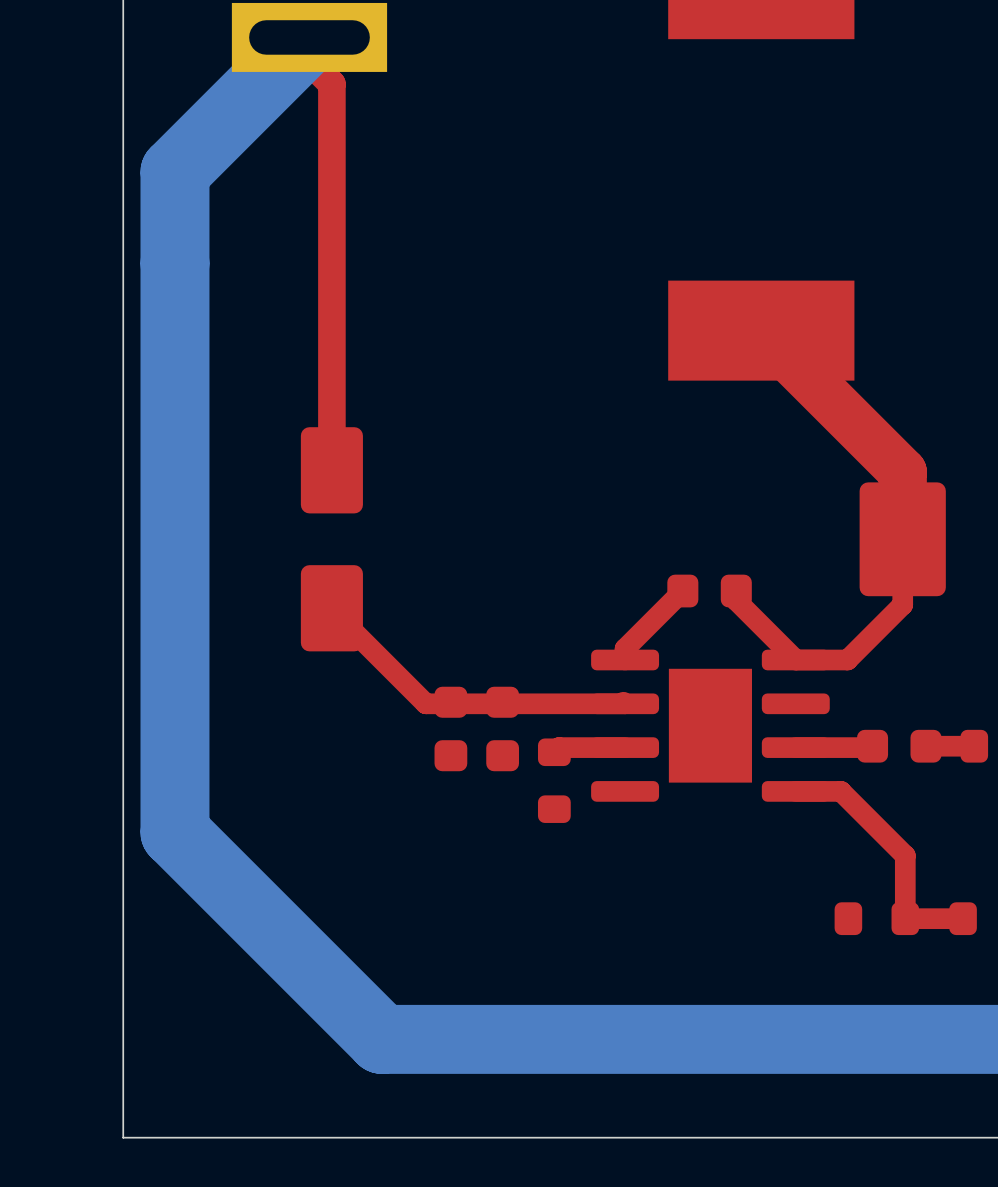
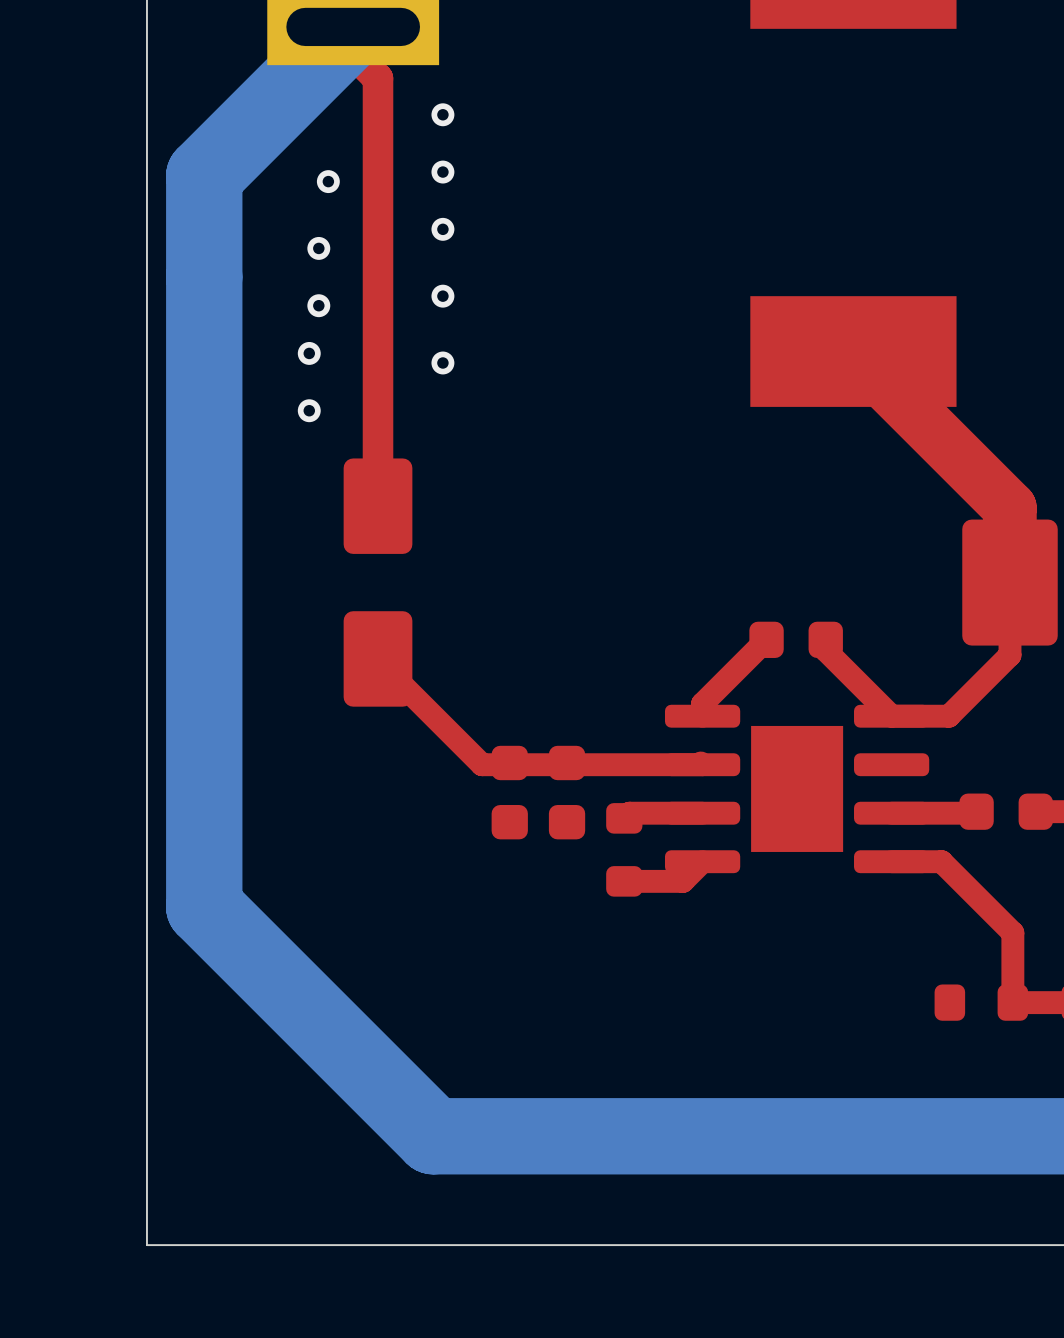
via: none -> (442, 114)
via: none -> (442, 172)
via: none -> (328, 181)
via: none -> (442, 229)
via: none -> (318, 248)
via: none -> (442, 296)
via: none -> (318, 305)
via: none -> (309, 353)
via: none -> (442, 362)
via: none -> (309, 410)
top track: none -> (702, 861) (682, 881) (624, 881)

